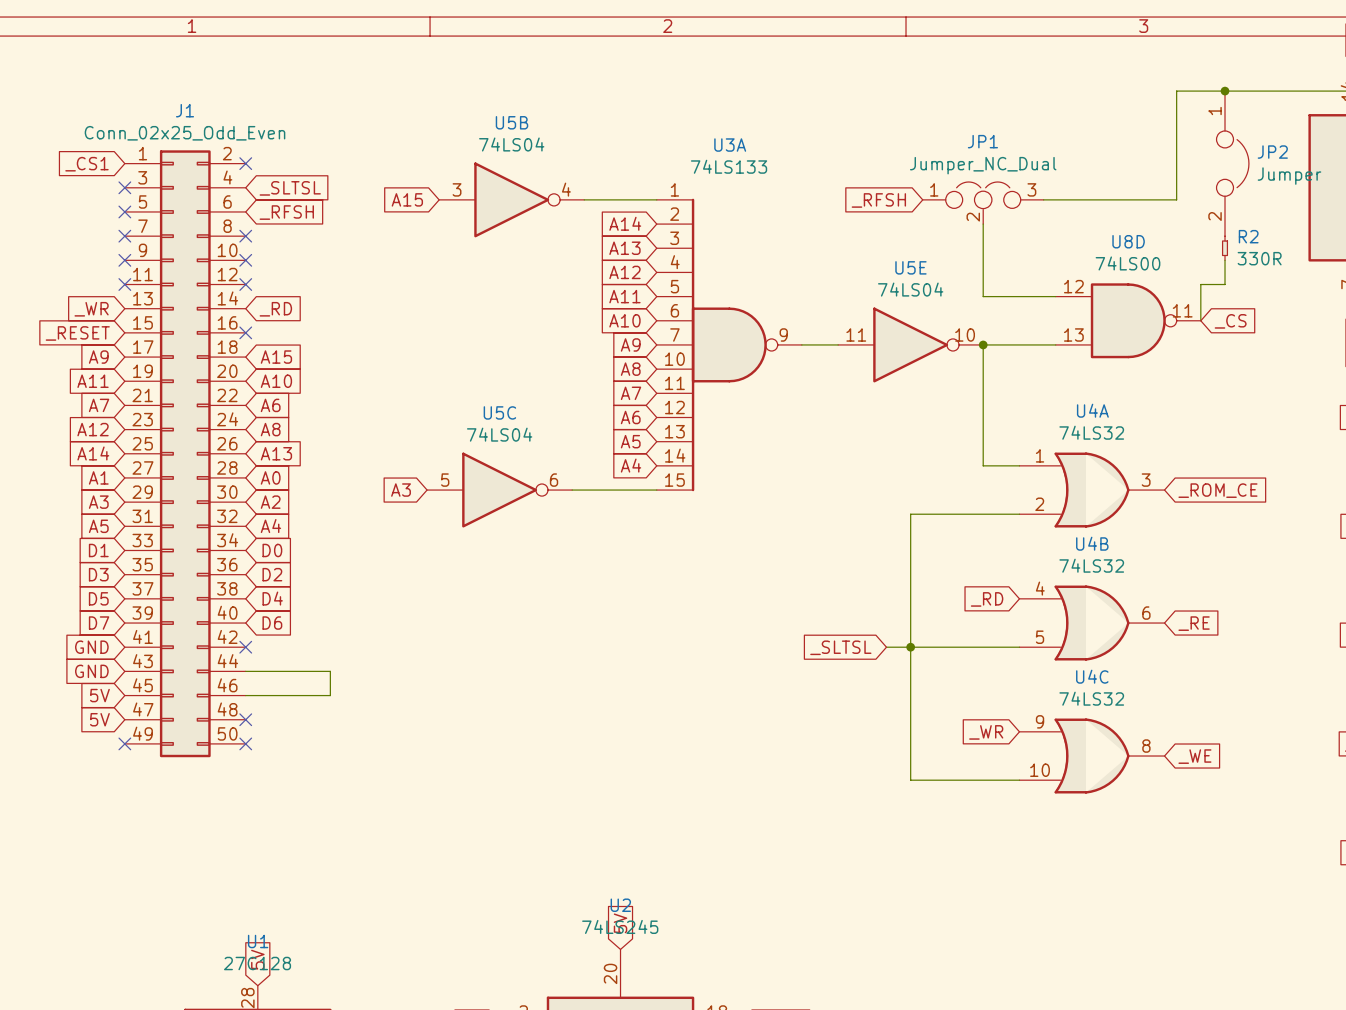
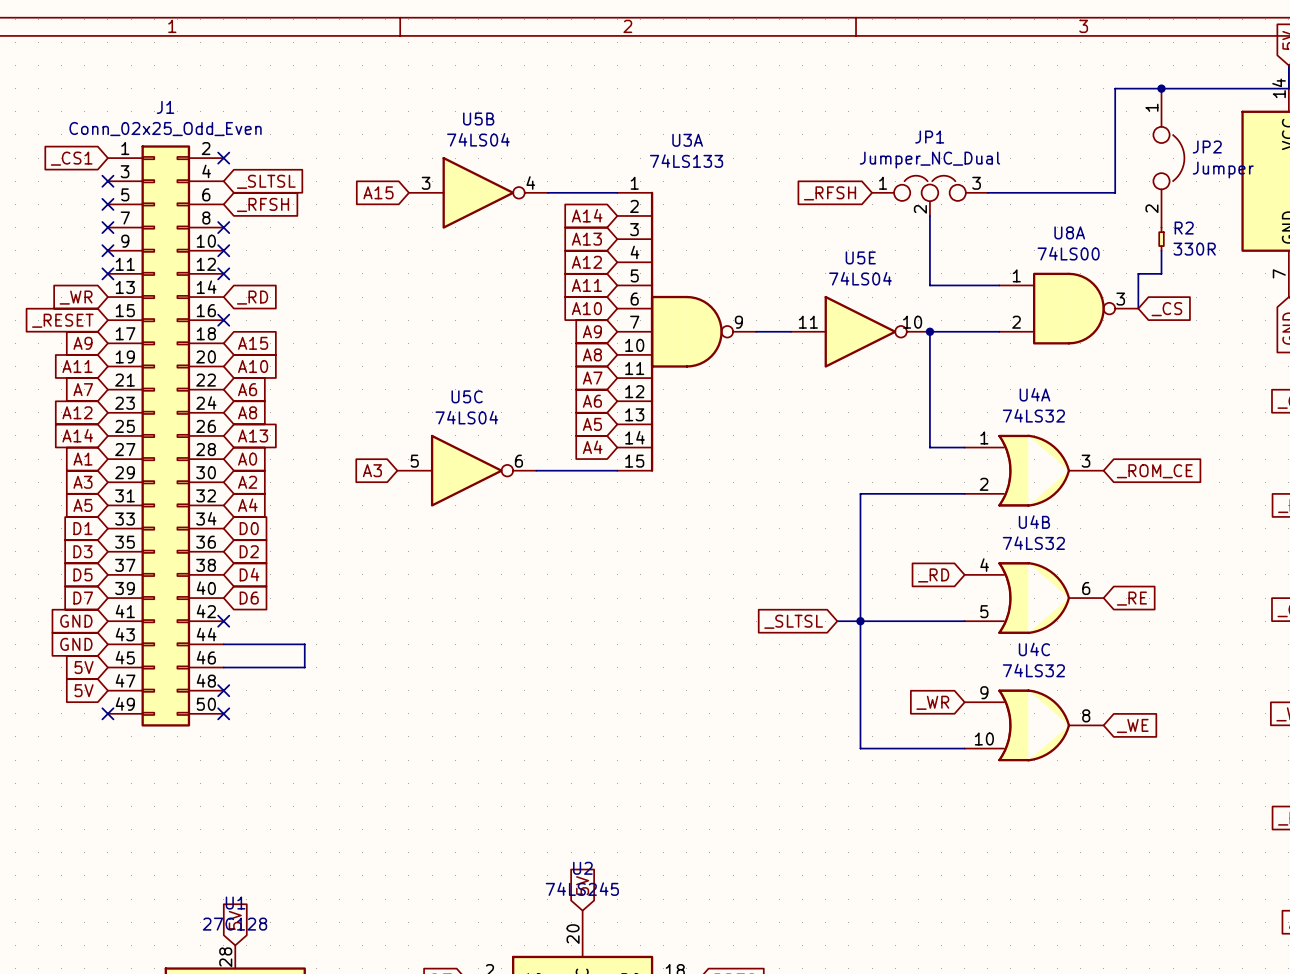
U8D name: U8D (1128, 241) -> U8A (1069, 232)
U8D pin number: 12 (1073, 286) -> 1 (1016, 275)
U8D pin number: 11 (1182, 310) -> 3 (1120, 299)
U8D pin number: 13 (1073, 334) -> 2 (1016, 322)

